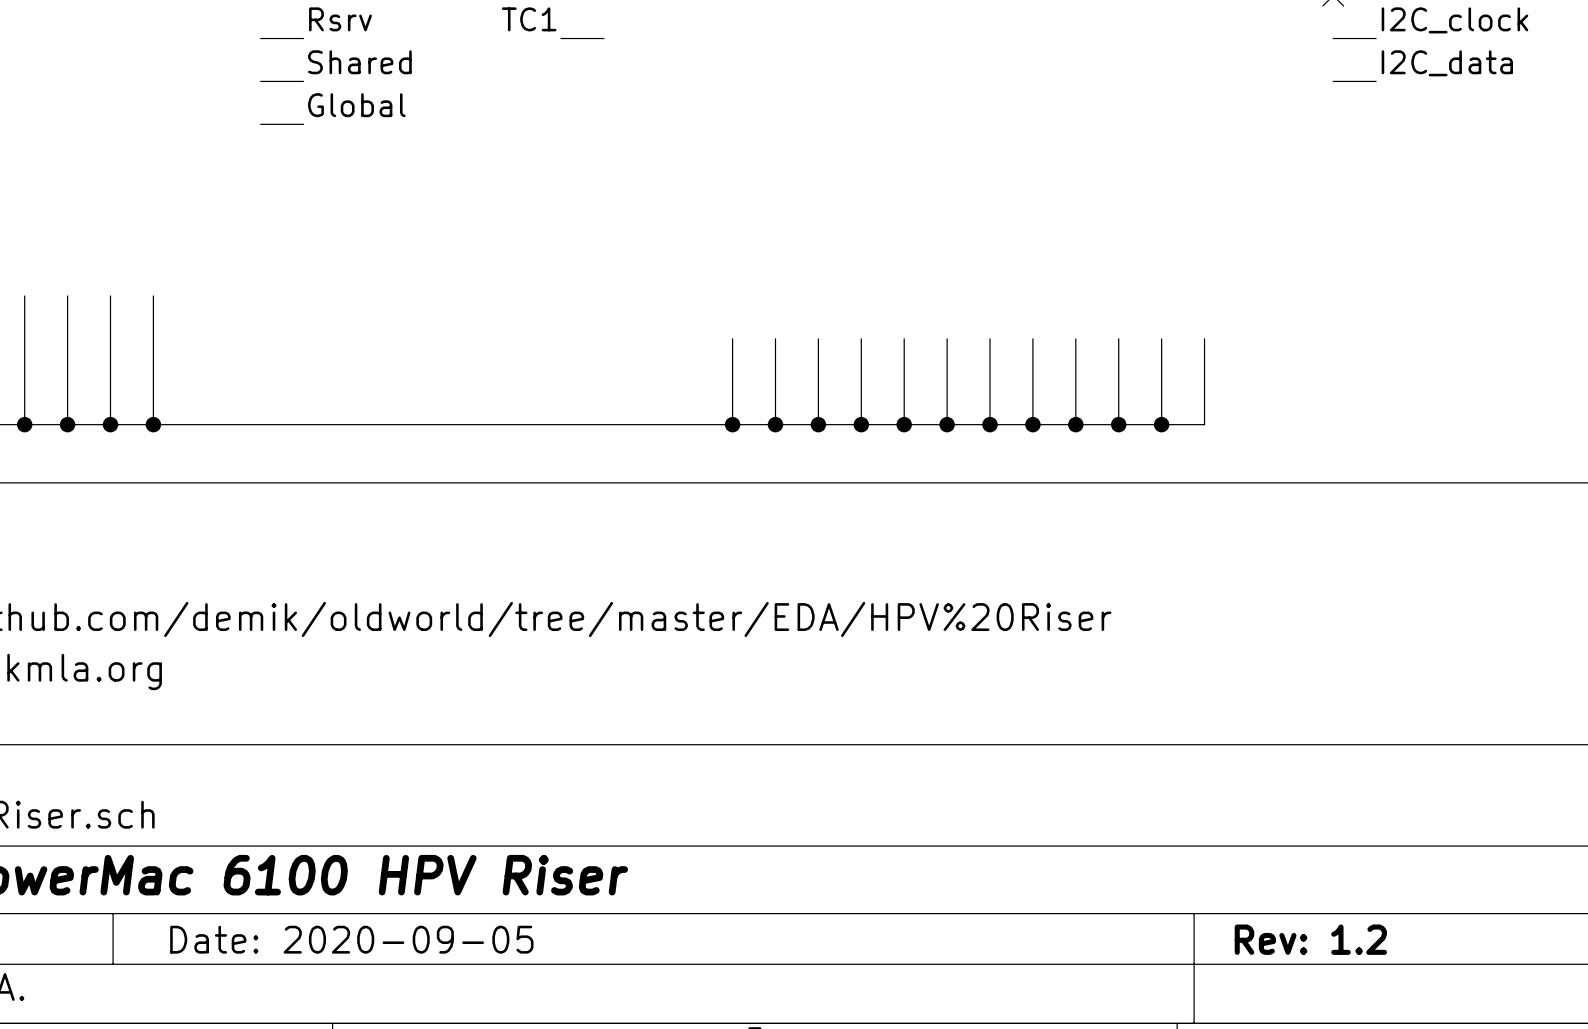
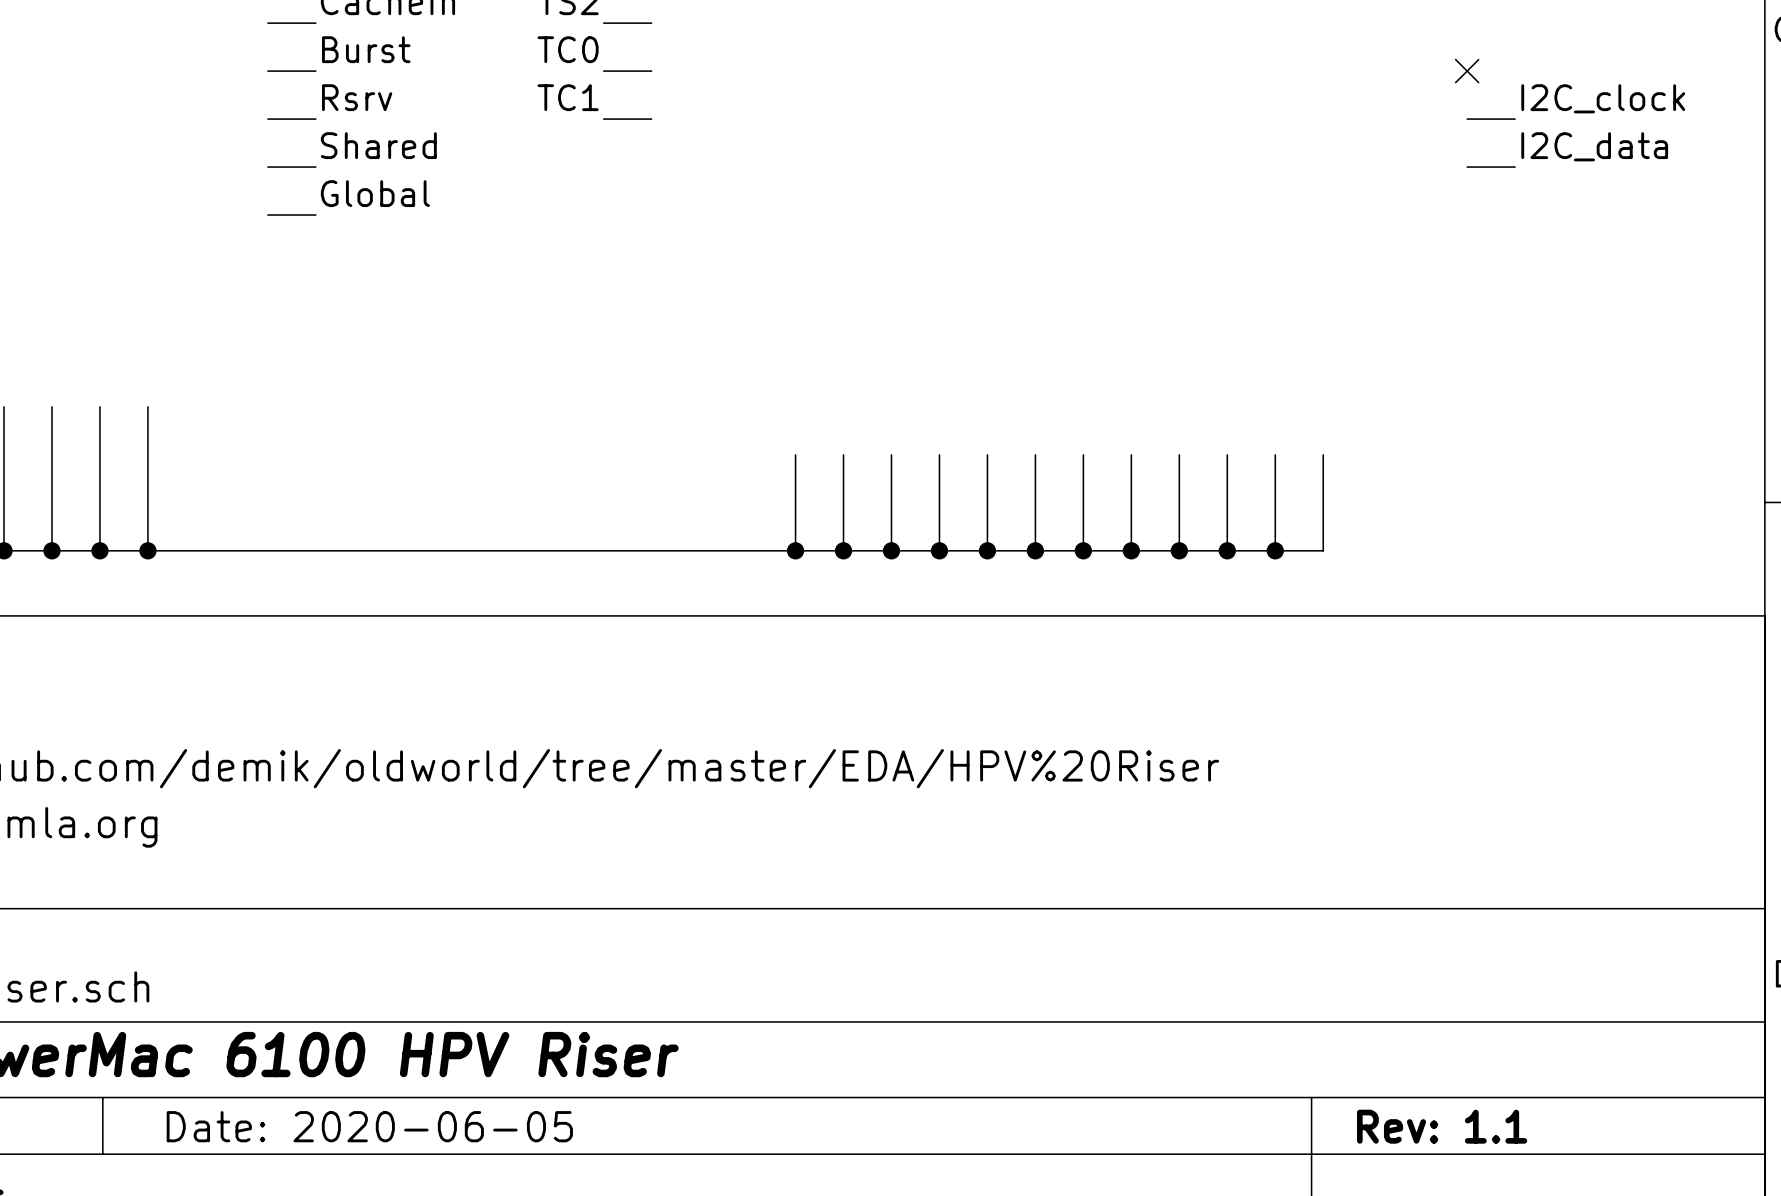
title block: Date: 2020-09-05 (351, 939) -> Date: 2020-06-05 (369, 1126)
title block: Rev: 1.2 (1310, 939) -> Rev: 1.1 (1442, 1126)

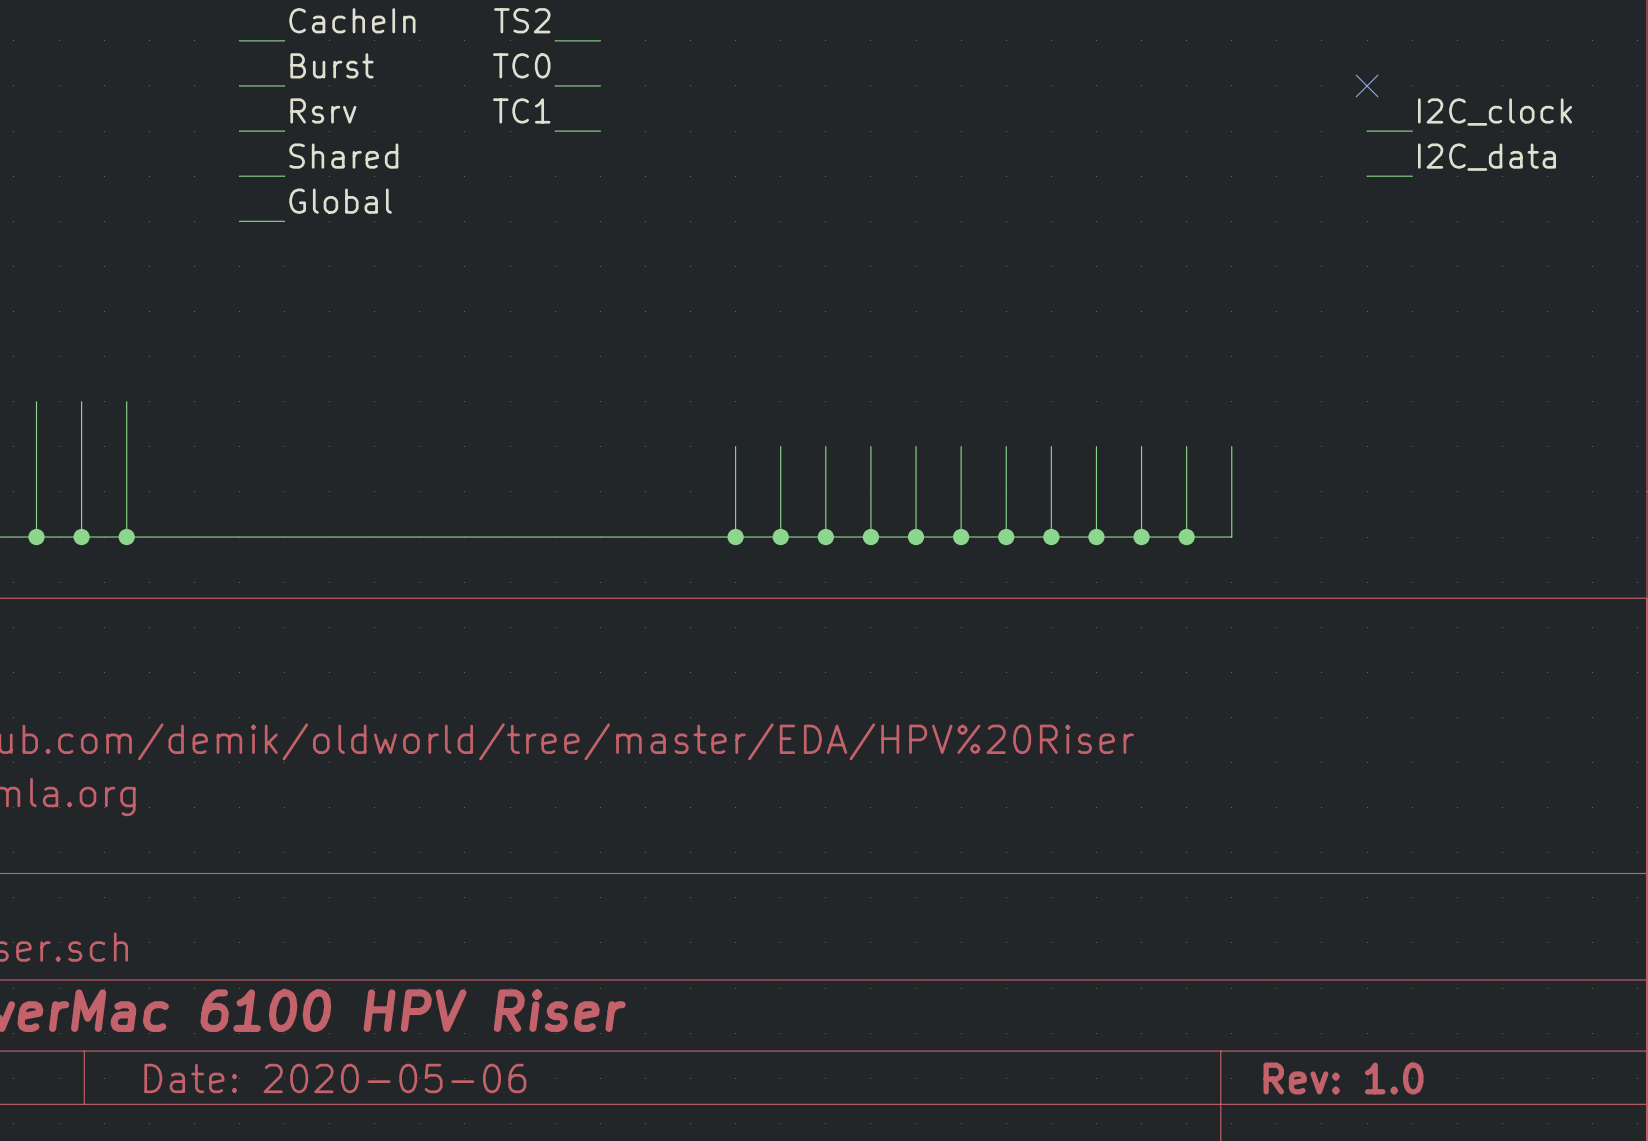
title block: Date: 2020-06-05 (369, 1126) -> Date: 2020-05-06 (335, 1078)
title block: Rev: 1.1 (1442, 1126) -> Rev: 1.0 (1343, 1078)

